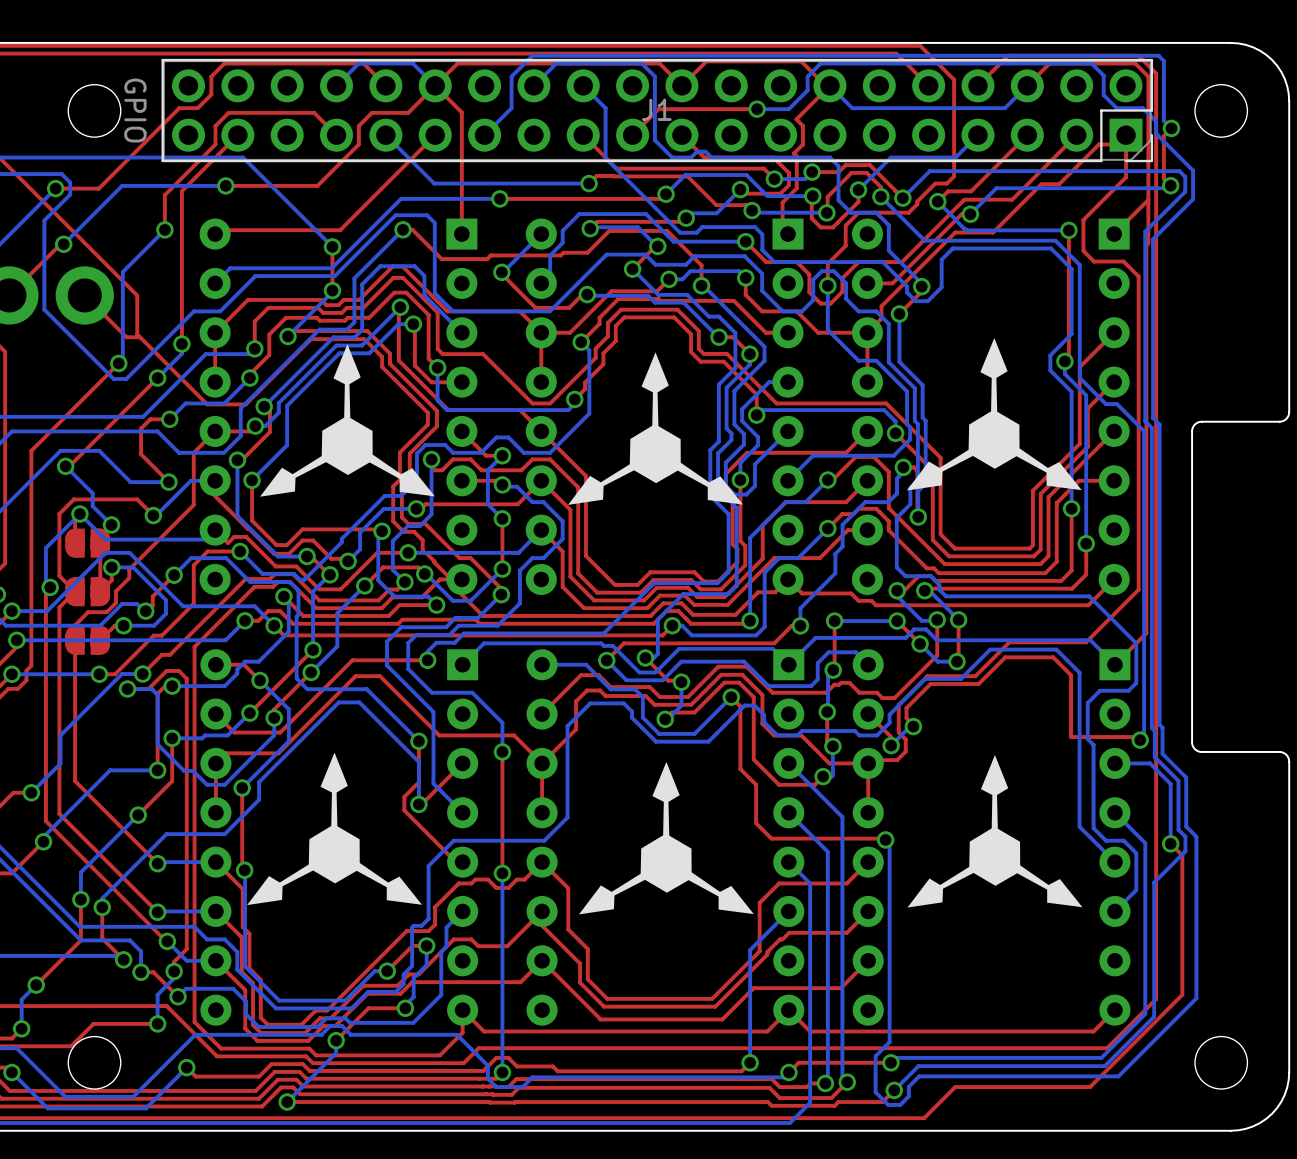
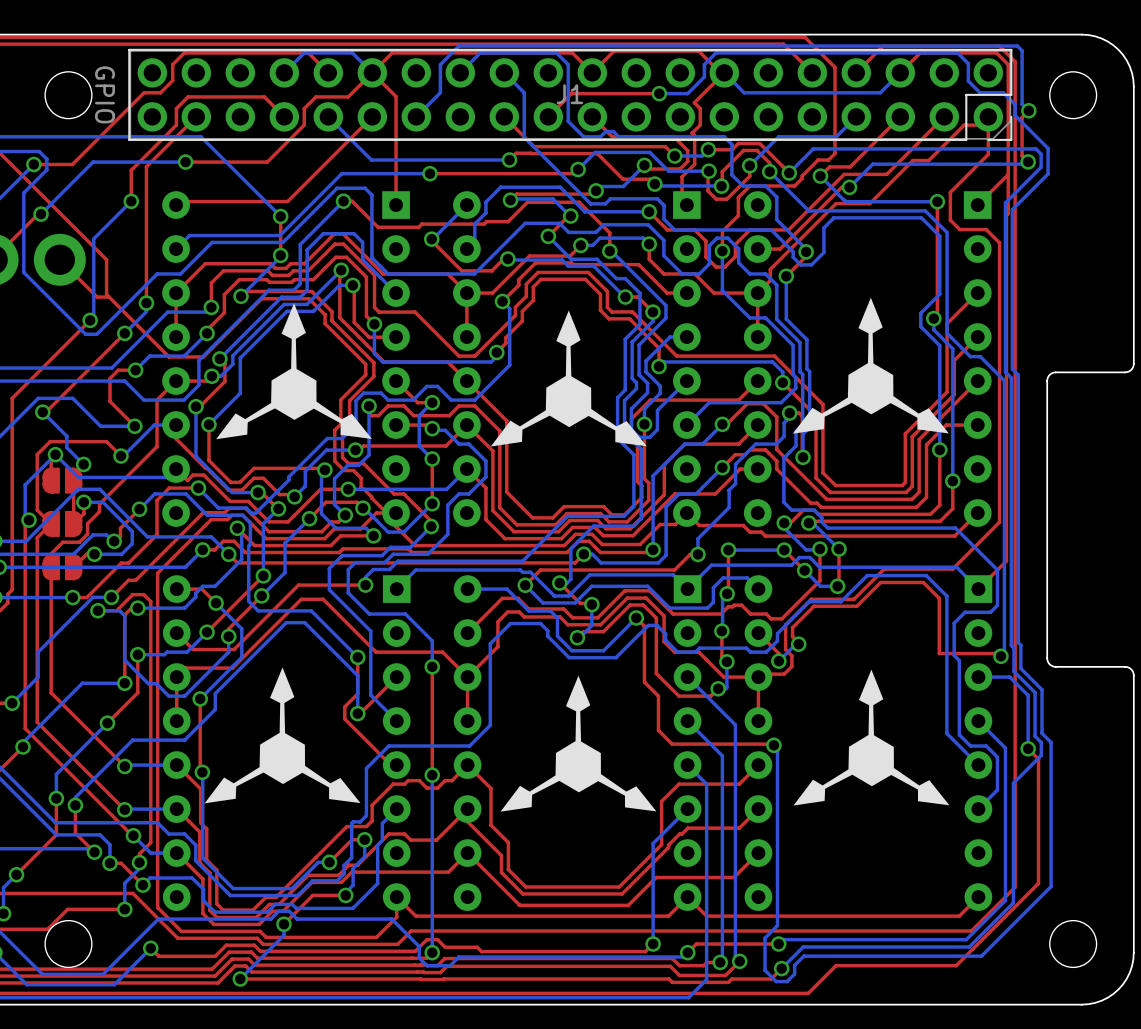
J1 footprint: [161, 58, 1154, 163] -> [128, 48, 1013, 141]

